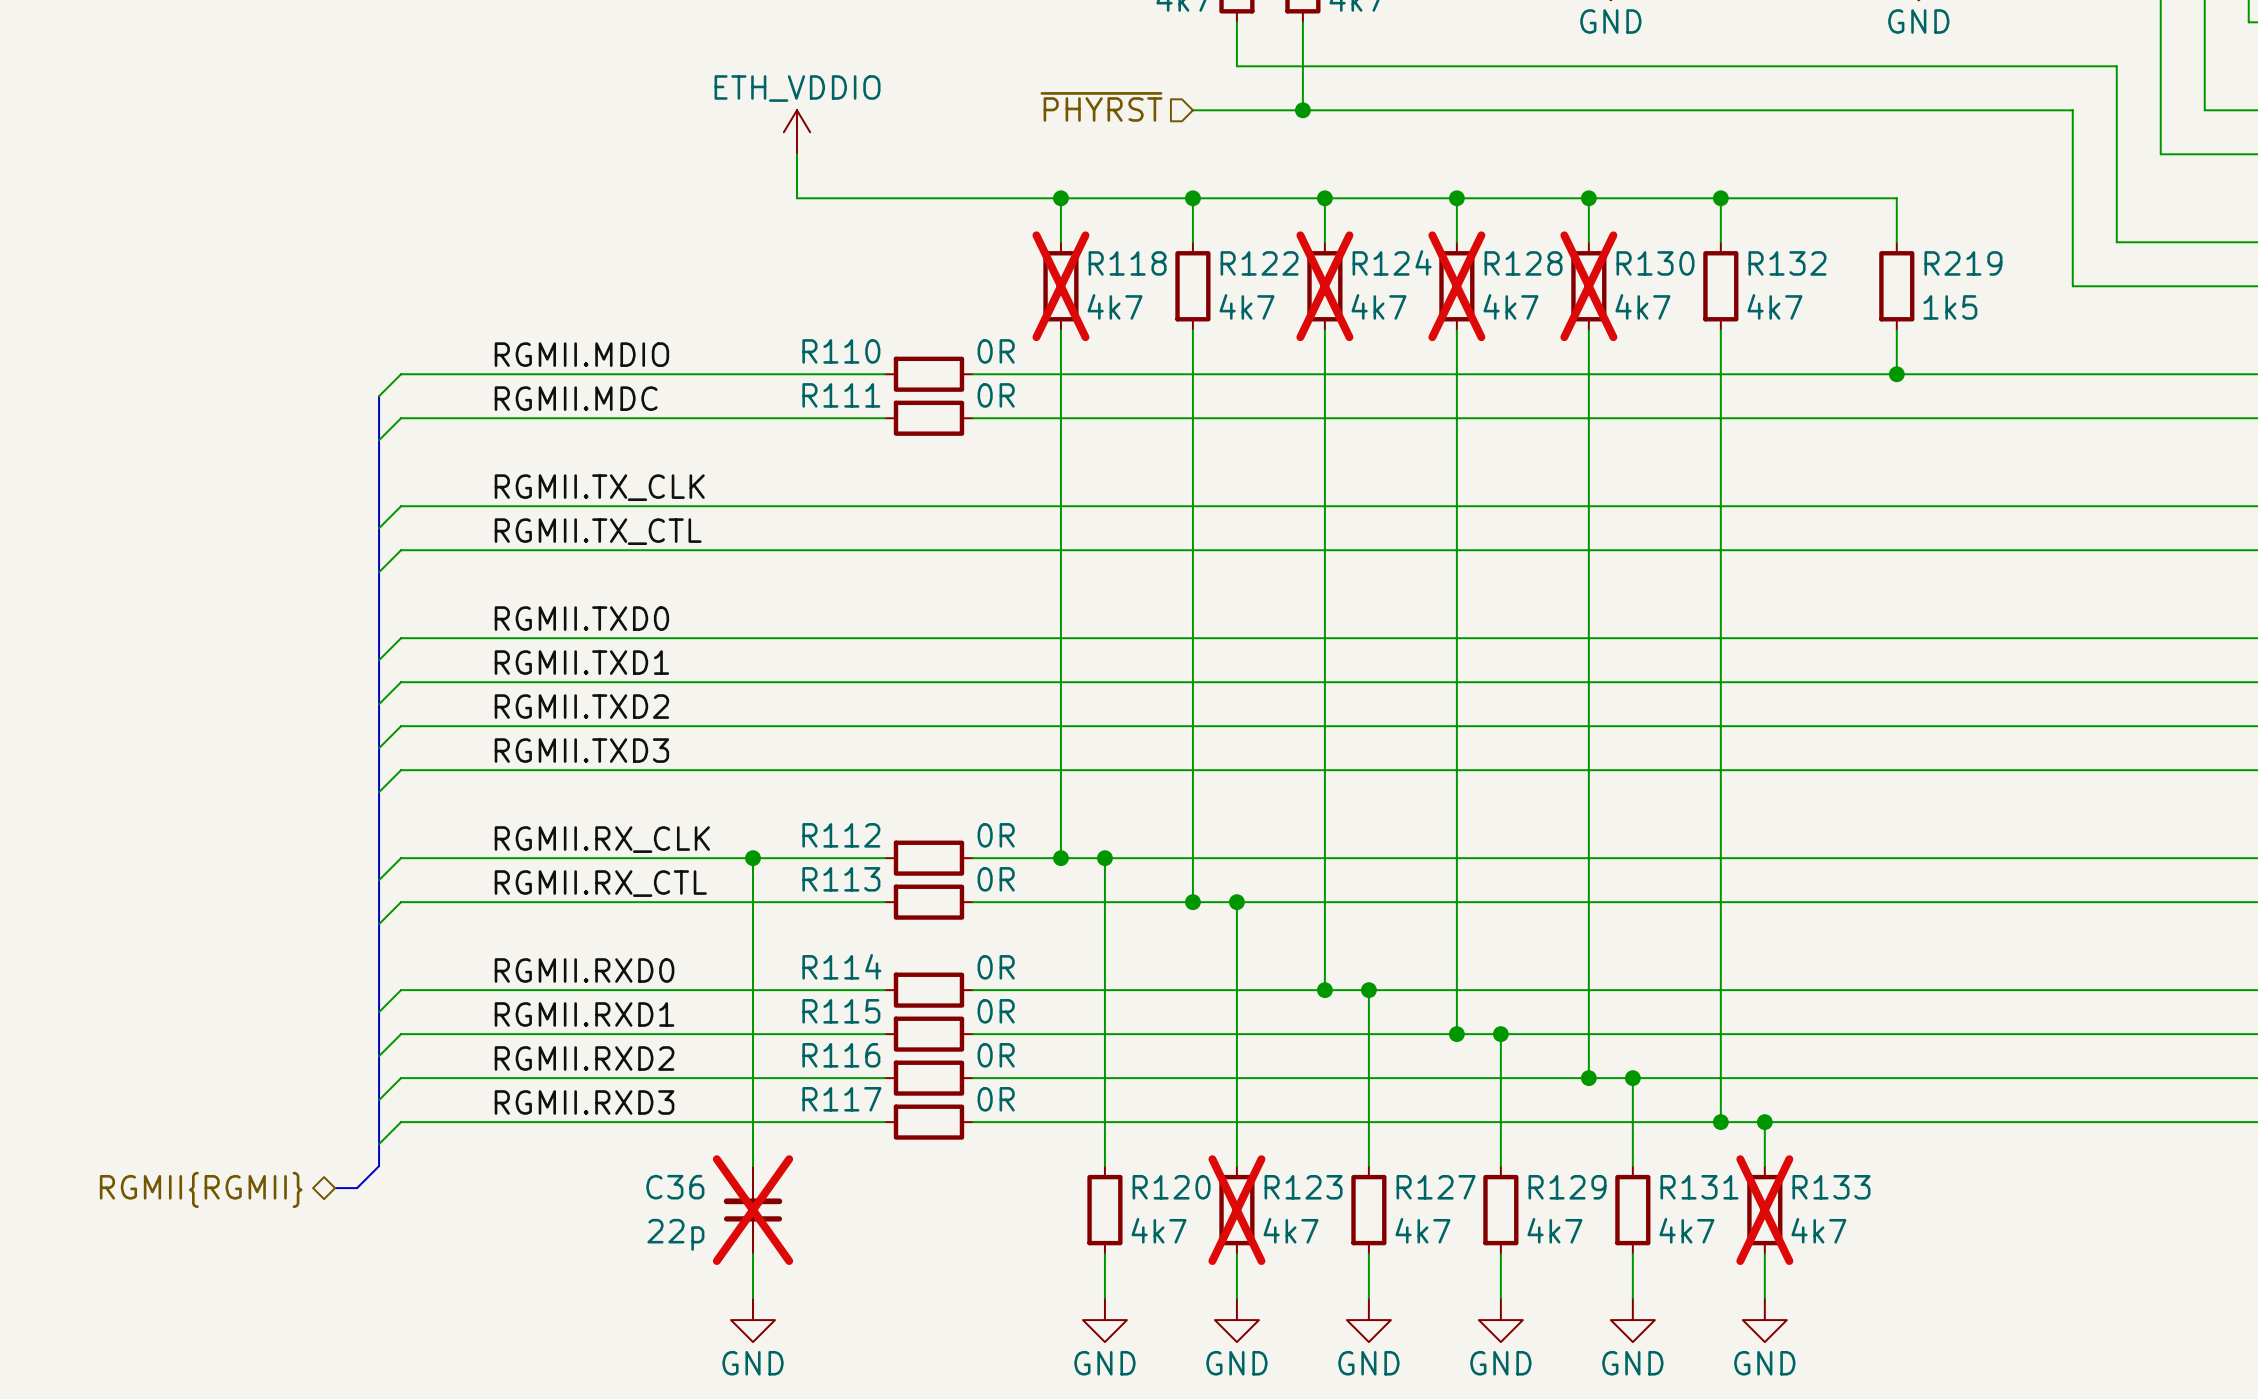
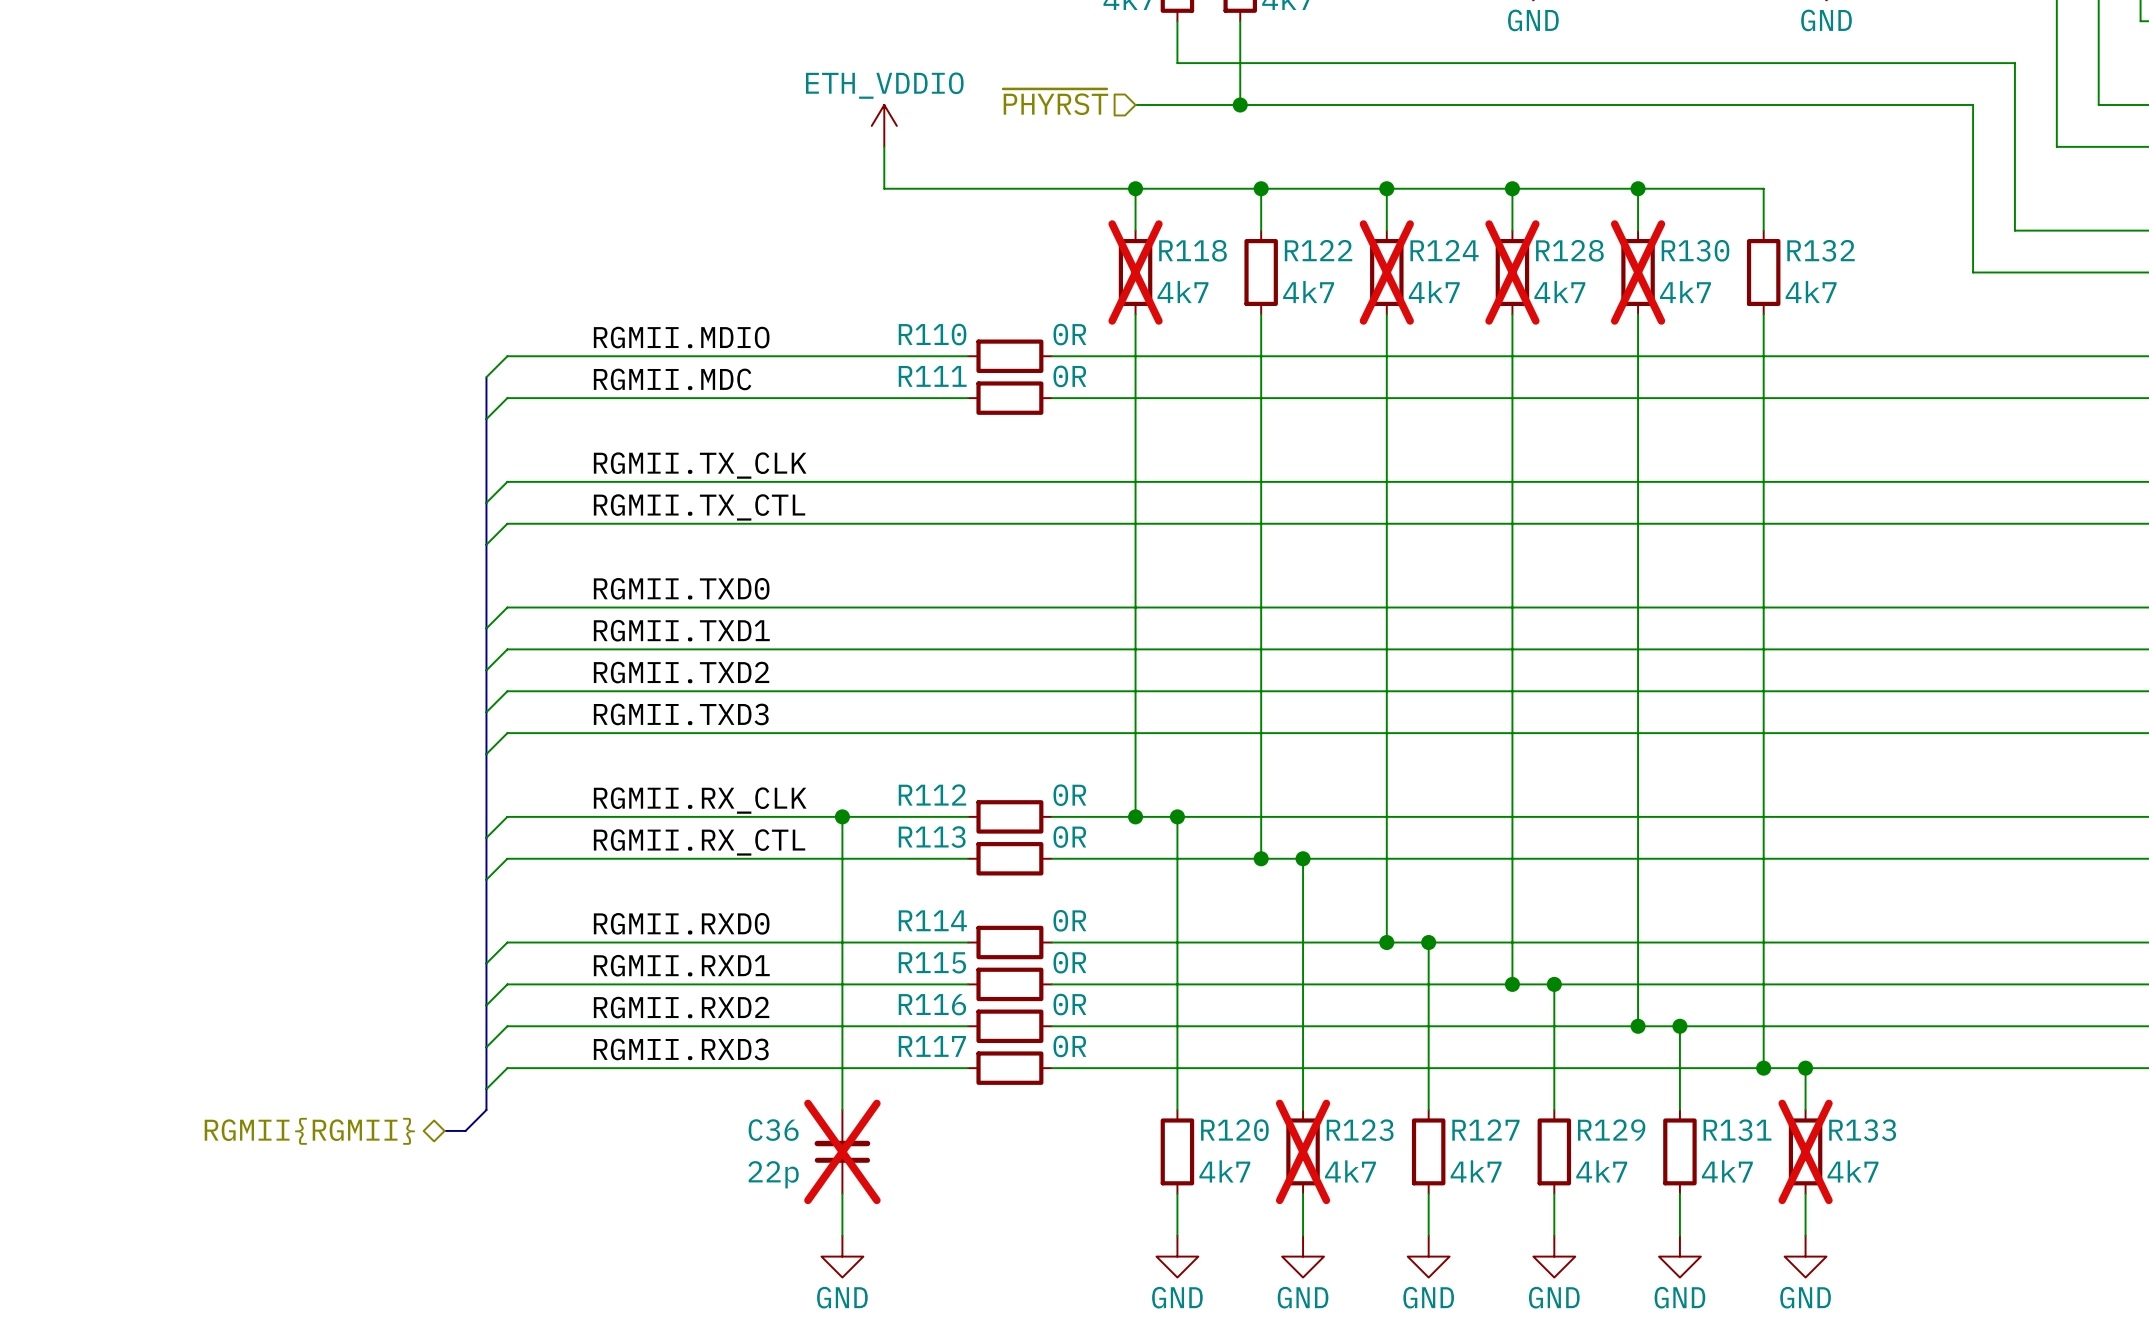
power symbol position: ETH_VDDIO (796, 132) -> ETH_VDDIO (884, 125)
wire: (796, 154) (796, 198) (928, 198) -> (884, 146) (884, 188)
wire: (1060, 198) (1060, 242) -> none
junction: (1060, 198) -> none
wire: (1852, 198) (1896, 198) (1896, 242) -> (1763, 188) (1763, 230)
R124 name: R124 (1392, 262) -> R122 (1318, 250)
R122 name: R122 (1259, 263) -> R118 (1193, 250)
R128 name: R128 (1523, 263) -> R124 (1444, 250)
R130 name: R130 (1655, 263) -> R128 (1569, 250)
R132 name: R132 (1787, 263) -> R130 (1695, 250)
R118: (1060, 286) -> none
R122 do-not-place cross: none -> (1135, 272)
R124 do-not-place cross: (1324, 286) -> none
R132 do-not-place cross: none -> (1638, 272)
R132: none -> (1763, 272)
R219: (1896, 286) -> none
wire: (1060, 330) (1060, 858) -> none
wire: none -> (1763, 314) (1763, 1068)
wire: (1896, 330) (1896, 374) -> none
label position: RGMII.MDIO (581, 354) -> RGMII.MDIO (681, 337)
wire: (533, 374) (401, 374) (379, 396) -> (507, 356) (486, 377)
R110 position: (928, 374) -> (1009, 356)
wire: (1016, 374) (1104, 374) -> (842, 356) (926, 356)
junction: (1896, 374) -> none
bus: (379, 396) (379, 1166) (357, 1188) (335, 1188) -> (486, 377) (486, 1110) (465, 1130) (444, 1130)
label position: RGMII.MDC (576, 398) -> RGMII.MDC (672, 379)
wire: (533, 418) (401, 418) (379, 440) -> (507, 398) (486, 419)
R111 position: (928, 418) -> (1009, 398)
wire: (1016, 418) (1104, 418) -> (842, 398) (926, 398)
label position: RGMII.TX_CLK (599, 487) -> RGMII.TX_CLK (700, 465)
wire: (533, 506) (401, 506) (379, 528) -> (507, 481) (486, 502)
label position: RGMII.TX_CTL (598, 531) -> RGMII.TX_CTL (699, 507)
wire: (533, 550) (401, 550) (379, 572) -> (507, 523) (486, 544)
label position: RGMII.TXD0 (581, 618) -> RGMII.TXD0 (681, 588)
wire: (533, 638) (401, 638) (379, 660) -> (507, 607) (486, 628)
label position: RGMII.TXD1 (581, 662) -> RGMII.TXD1 (681, 630)
wire: (533, 682) (401, 682) (379, 704) -> (507, 649) (486, 670)
label position: RGMII.TXD2 (581, 706) -> RGMII.TXD2 (681, 672)
wire: (533, 726) (401, 726) (379, 748) -> (507, 691) (486, 712)
label position: RGMII.TXD3 (581, 750) -> RGMII.TXD3 (681, 714)
wire: (533, 770) (401, 770) (379, 792) -> (507, 733) (486, 754)
label position: RGMII.RX_CLK (602, 839) -> RGMII.RX_CLK (700, 800)
wire: (533, 858) (401, 858) (379, 880) -> (507, 816) (486, 837)
wire: (753, 858) (753, 1166) -> none
junction: (753, 858) -> none
junction: none -> (842, 816)
R112 position: (928, 858) -> (1009, 816)
wire: none -> (926, 816) (842, 816) (842, 1110)
wire: (1016, 858) (1104, 858) (1104, 1166) -> none
junction: (1060, 858) -> none
junction: (1104, 858) -> none
wire: (1192, 858) (1192, 902) -> (1177, 816) (1177, 858)
junction: none -> (1135, 816)
junction: none -> (1177, 816)
label position: RGMII.RX_CTL (600, 883) -> RGMII.RX_CTL (699, 842)
wire: (533, 902) (401, 902) (379, 924) -> (507, 858) (486, 879)
R113 position: (928, 902) -> (1009, 858)
wire: (1016, 902) (1104, 902) -> (842, 858) (926, 858)
junction: (1192, 902) -> none
junction: (1236, 902) -> none
wire: (1324, 902) (1324, 990) -> (1303, 858) (1303, 942)
junction: none -> (1261, 858)
junction: none -> (1303, 858)
label position: RGMII.RXD0 (584, 970) -> RGMII.RXD0 (681, 923)
wire: (533, 990) (401, 990) (379, 1012) -> (507, 942) (486, 963)
R114 position: (928, 990) -> (1009, 942)
wire: (1016, 990) (1104, 990) -> (842, 942) (926, 942)
junction: (1324, 990) -> none
junction: (1368, 990) -> none
wire: (1456, 990) (1456, 1034) -> (1428, 942) (1428, 984)
junction: none -> (1386, 942)
junction: none -> (1428, 942)
label position: RGMII.RXD1 (584, 1014) -> RGMII.RXD1 (681, 965)
wire: (533, 1034) (401, 1034) (379, 1056) -> (507, 984) (486, 1005)
R115 position: (928, 1034) -> (1009, 984)
wire: (1016, 1034) (1104, 1034) -> (842, 984) (926, 984)
junction: (1456, 1034) -> none
junction: (1500, 1034) -> none
wire: (1588, 1034) (1588, 1078) -> (1554, 984) (1554, 1026)
junction: none -> (1512, 984)
junction: none -> (1554, 984)
label position: RGMII.RXD2 (584, 1058) -> RGMII.RXD2 (681, 1007)
wire: (533, 1078) (401, 1078) (379, 1100) -> (507, 1026) (486, 1047)
R116 position: (928, 1078) -> (1009, 1026)
wire: (1016, 1078) (1104, 1078) -> (842, 1026) (926, 1026)
junction: (1588, 1078) -> none
junction: (1632, 1078) -> none
wire: (1720, 1078) (1720, 1122) -> (1679, 1026) (1679, 1068)
junction: none -> (1638, 1026)
junction: none -> (1679, 1026)
label position: RGMII.RXD3 (584, 1102) -> RGMII.RXD3 (681, 1049)
wire: (533, 1122) (401, 1122) (379, 1144) -> (507, 1068) (486, 1089)
R117 position: (928, 1122) -> (1009, 1068)
wire: (1016, 1122) (1104, 1122) -> (842, 1068) (926, 1068)
junction: (1720, 1122) -> none
junction: (1764, 1122) -> none
junction: none -> (1763, 1068)
wire: none -> (1805, 1068) (1805, 1110)
junction: none -> (1805, 1068)
R123 name: R123 (1303, 1187) -> R120 (1234, 1130)
R127 name: R127 (1436, 1187) -> R123 (1360, 1130)
R129 name: R129 (1567, 1187) -> R127 (1485, 1130)
R131 name: R131 (1699, 1187) -> R129 (1611, 1130)
R133 name: R133 (1831, 1187) -> R131 (1737, 1130)
hierarchical label position: RGMII{RGMII} (201, 1189) -> RGMII{RGMII} (309, 1131)
C36 position: (753, 1210) -> (842, 1151)
R120: (1104, 1210) -> none
R123 do-not-place cross: (1236, 1210) -> none
R127 do-not-place cross: none -> (1303, 1151)
R133 do-not-place cross: (1764, 1210) -> none
R133: none -> (1805, 1151)
wire: (753, 1254) (753, 1298) -> (842, 1193) (842, 1235)
wire: (1104, 1254) (1104, 1298) -> none
wire: none -> (1805, 1193) (1805, 1235)
power symbol: GND (753, 1320) -> none
power symbol: none -> GND (842, 1256)
power symbol: GND (1104, 1320) -> none
power symbol: none -> GND (1805, 1256)

